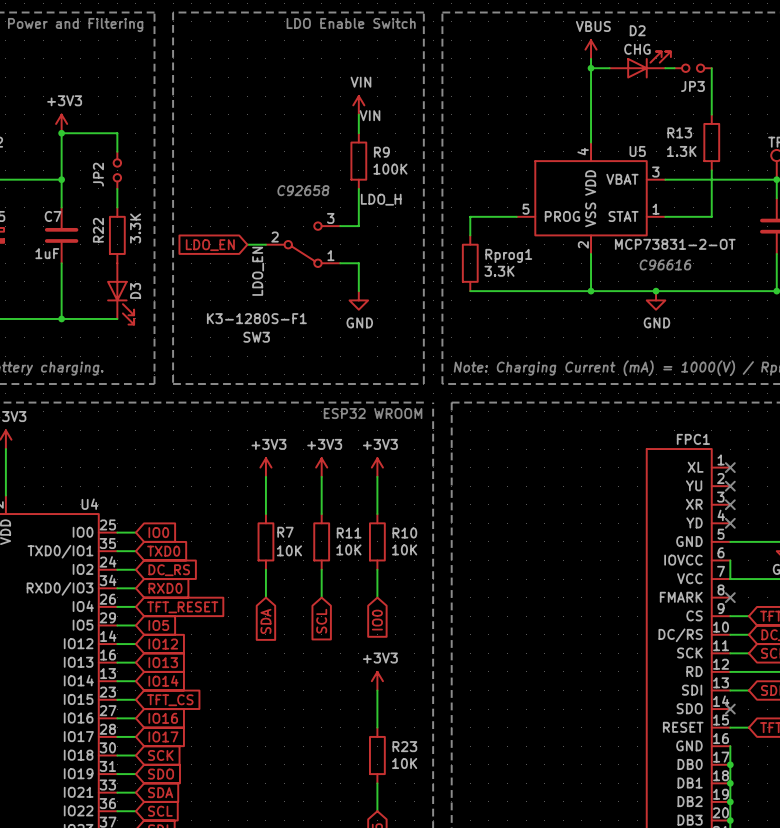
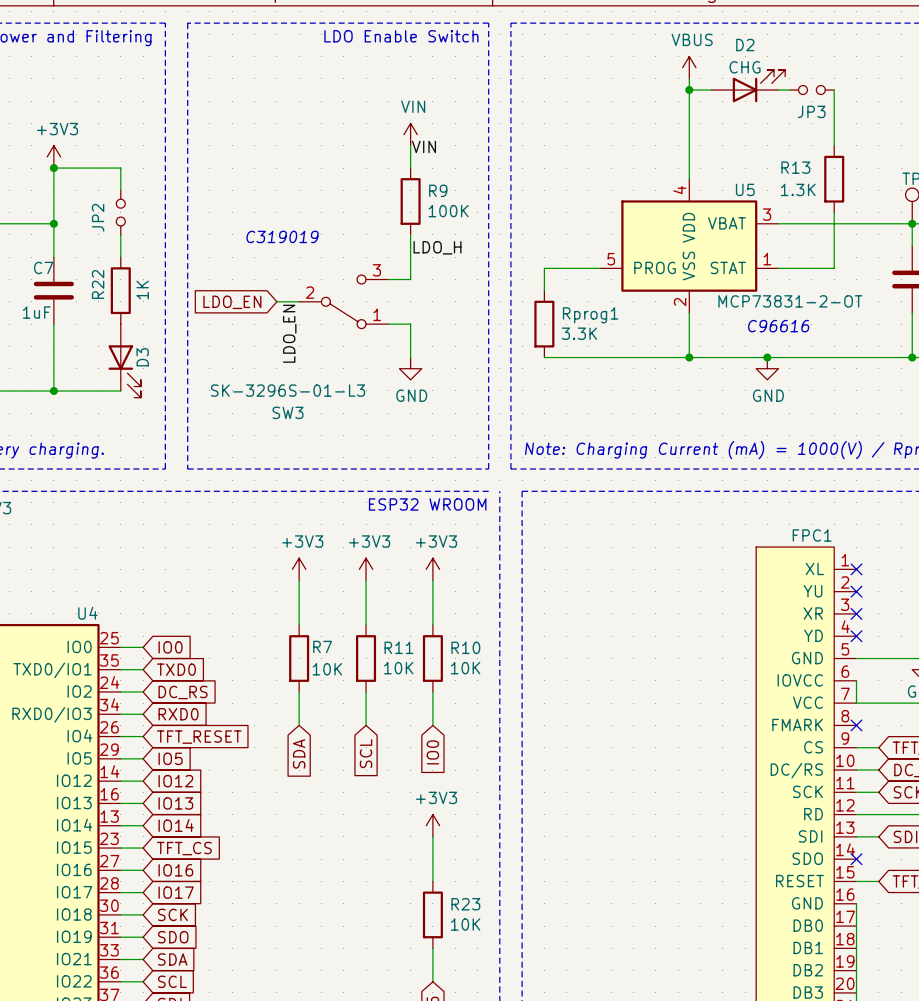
text: none -> C319019 (282, 236)
text: C92658 (303, 190) -> none
R22 value: 3.3K (135, 228) -> 1K (142, 290)
SW3 value: K3-1280S-F1 (256, 318) -> SK-3296S-01-L3 (288, 390)
junction: (730, 764) -> none
junction: (730, 783) -> none
junction: (730, 801) -> none
junction: (730, 820) -> none

